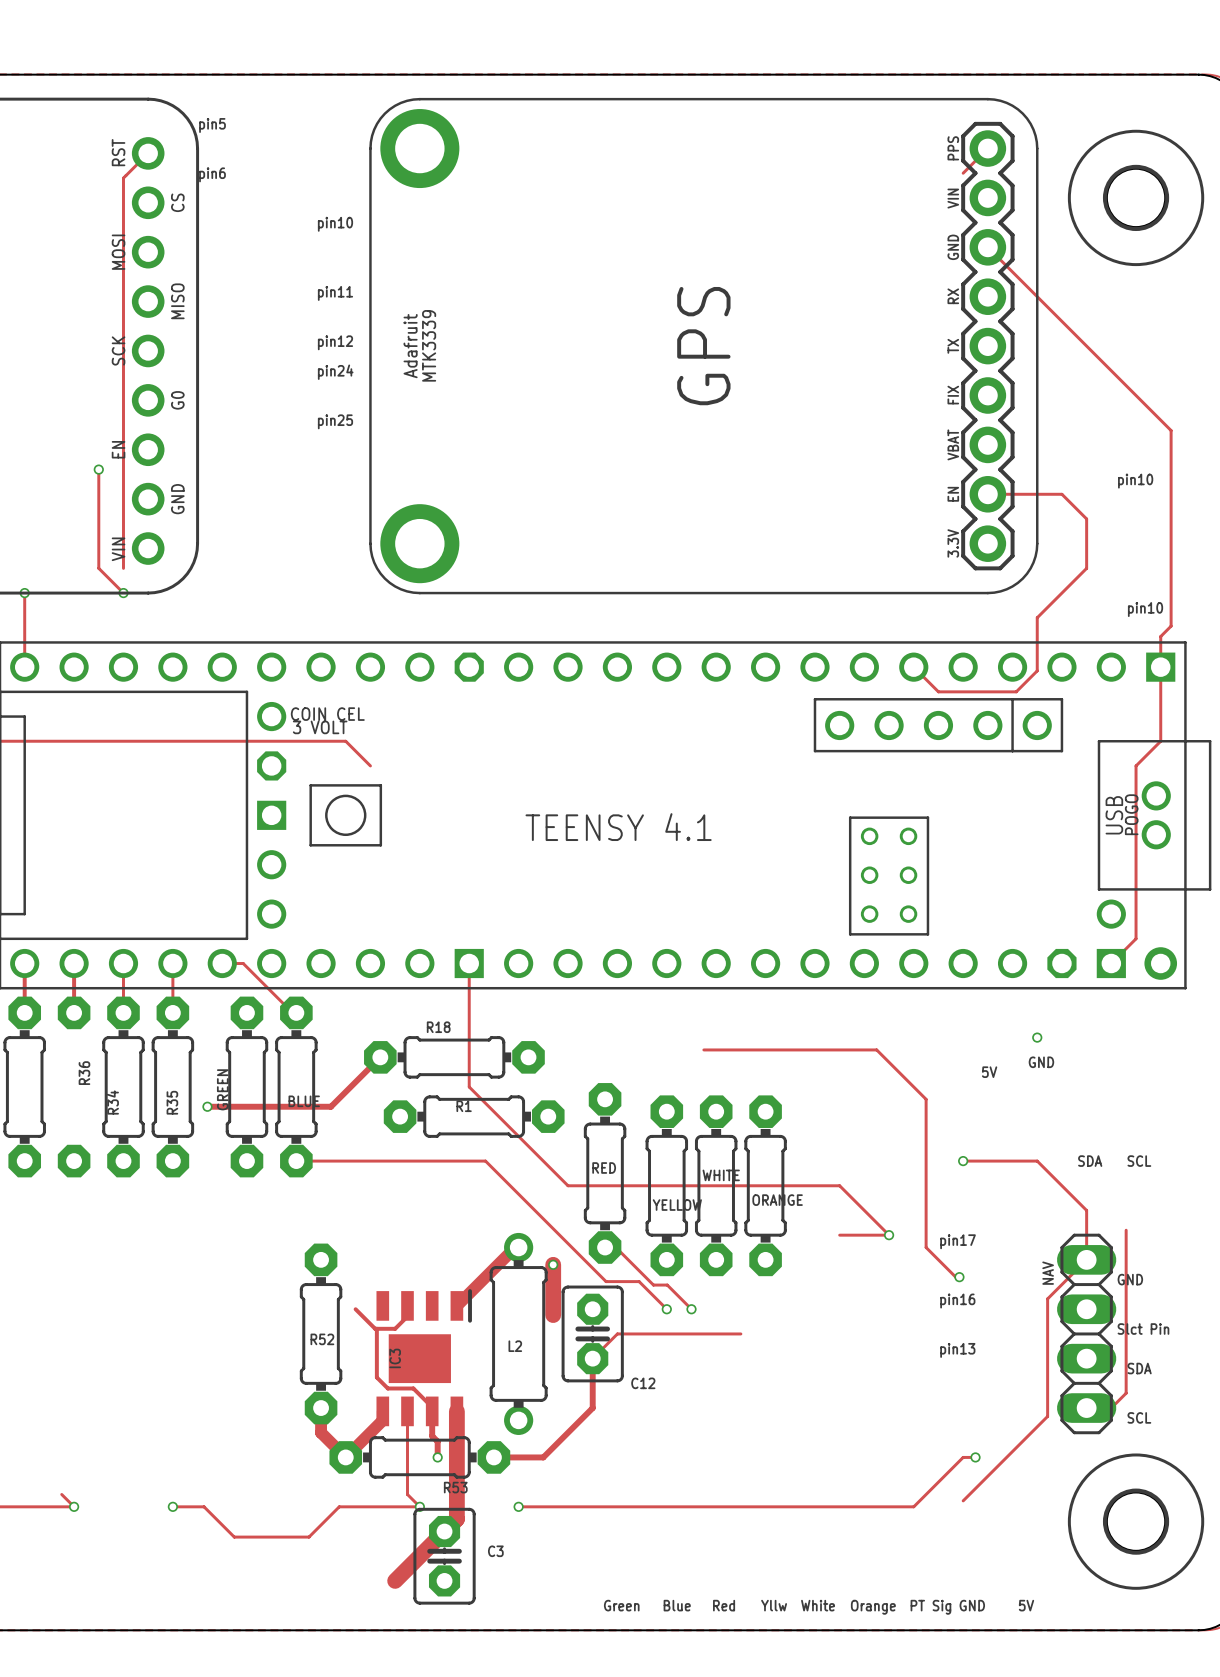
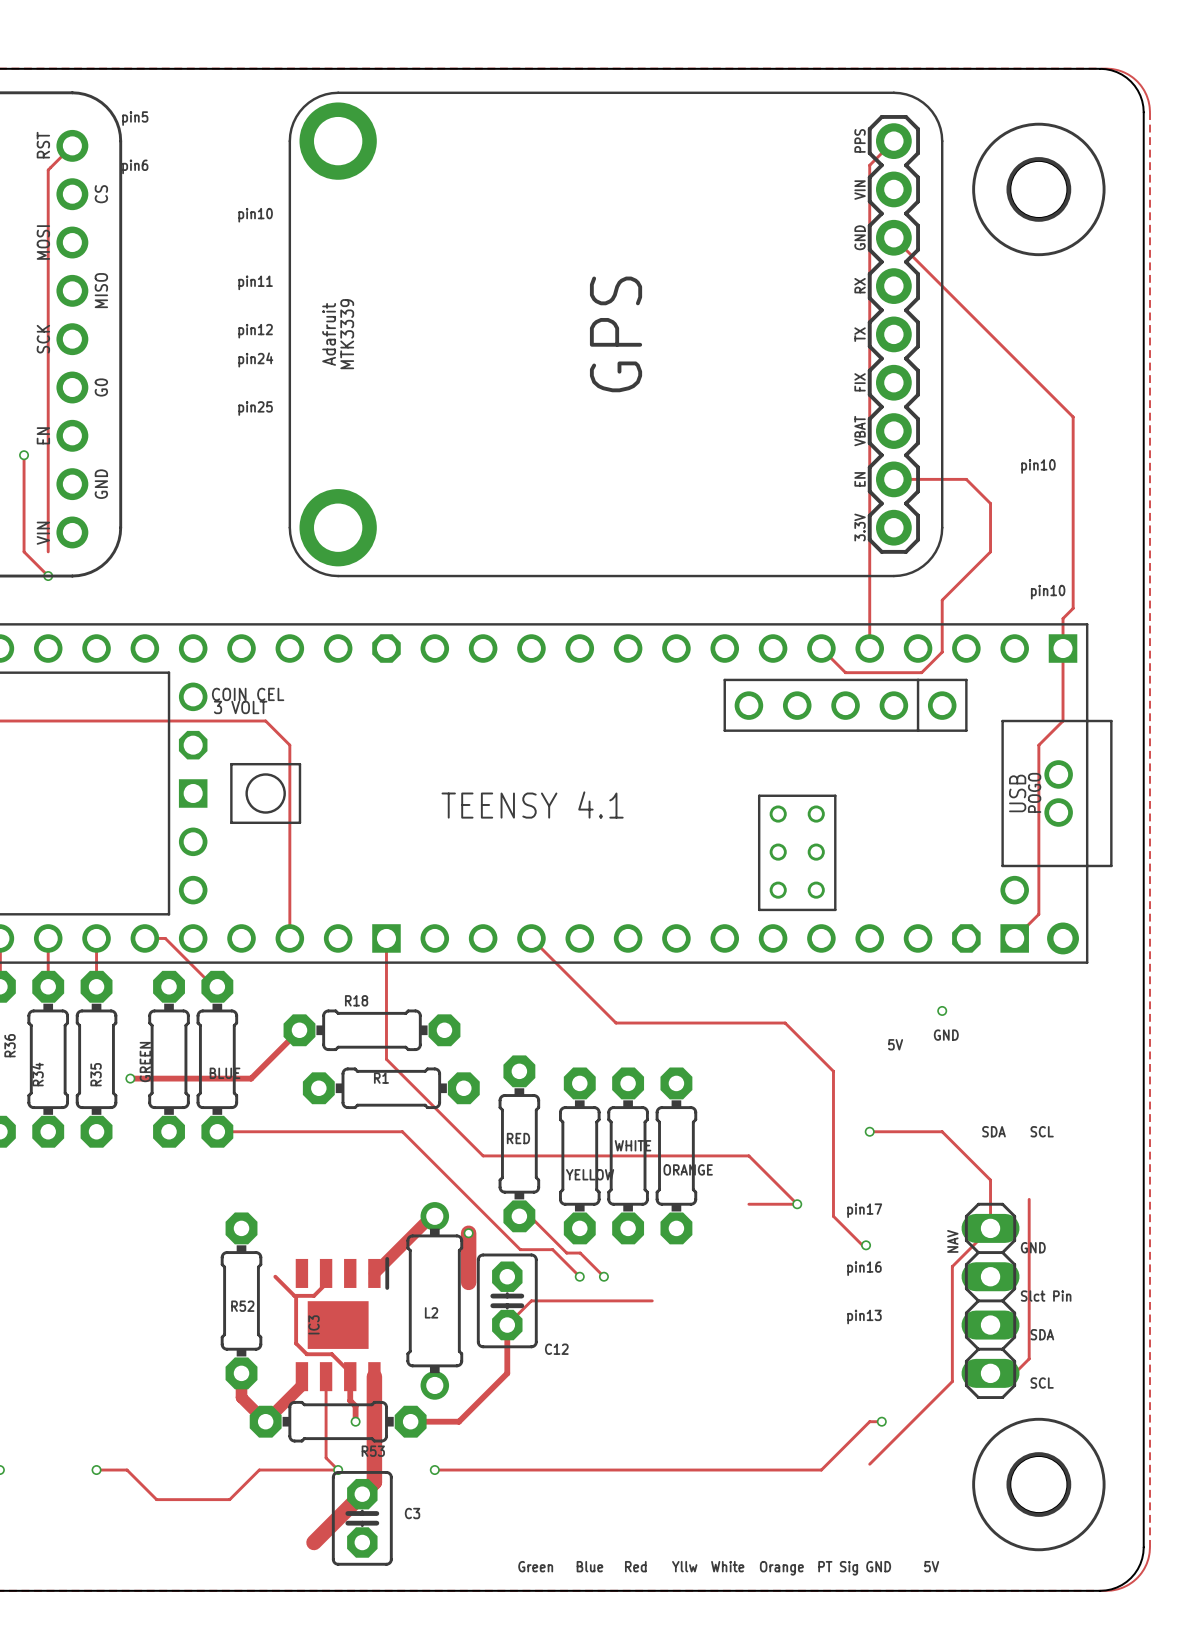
track: none -> (869, 165) (869, 648)
track: none -> (289, 745) (289, 938)
track: none -> (531, 938) (616, 1023)

